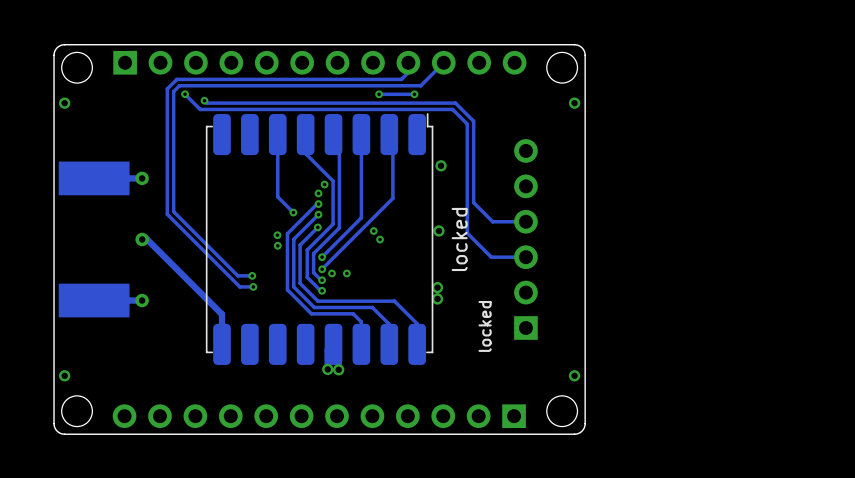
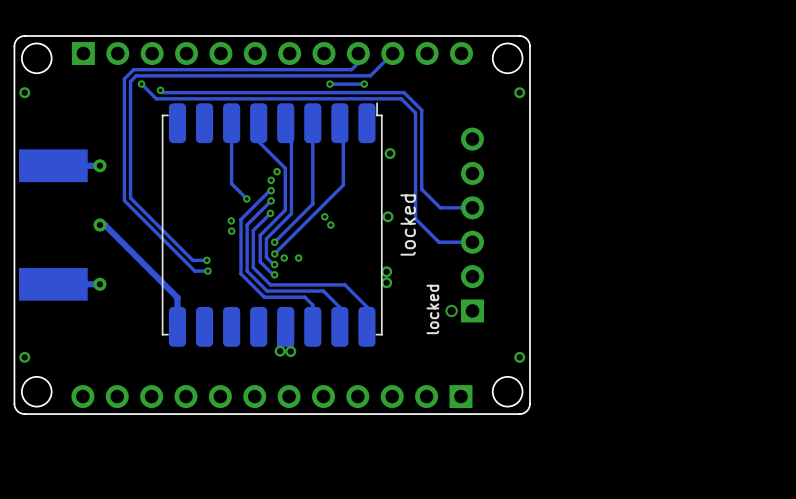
via: none -> (451, 310)

